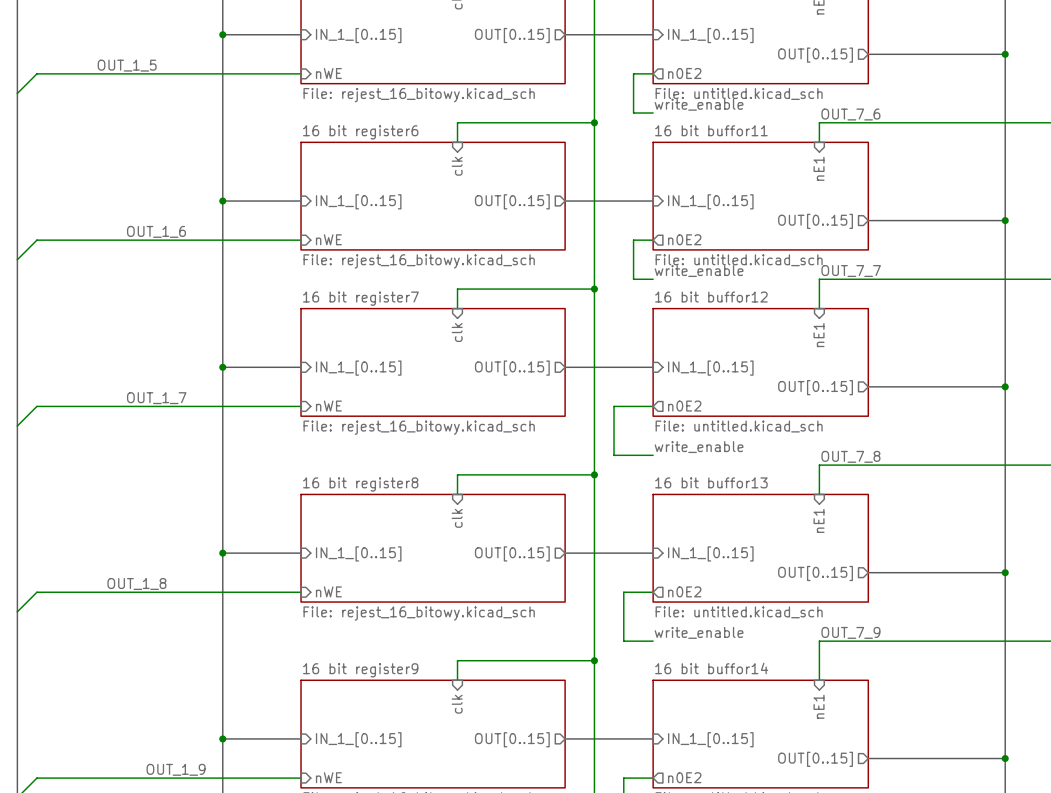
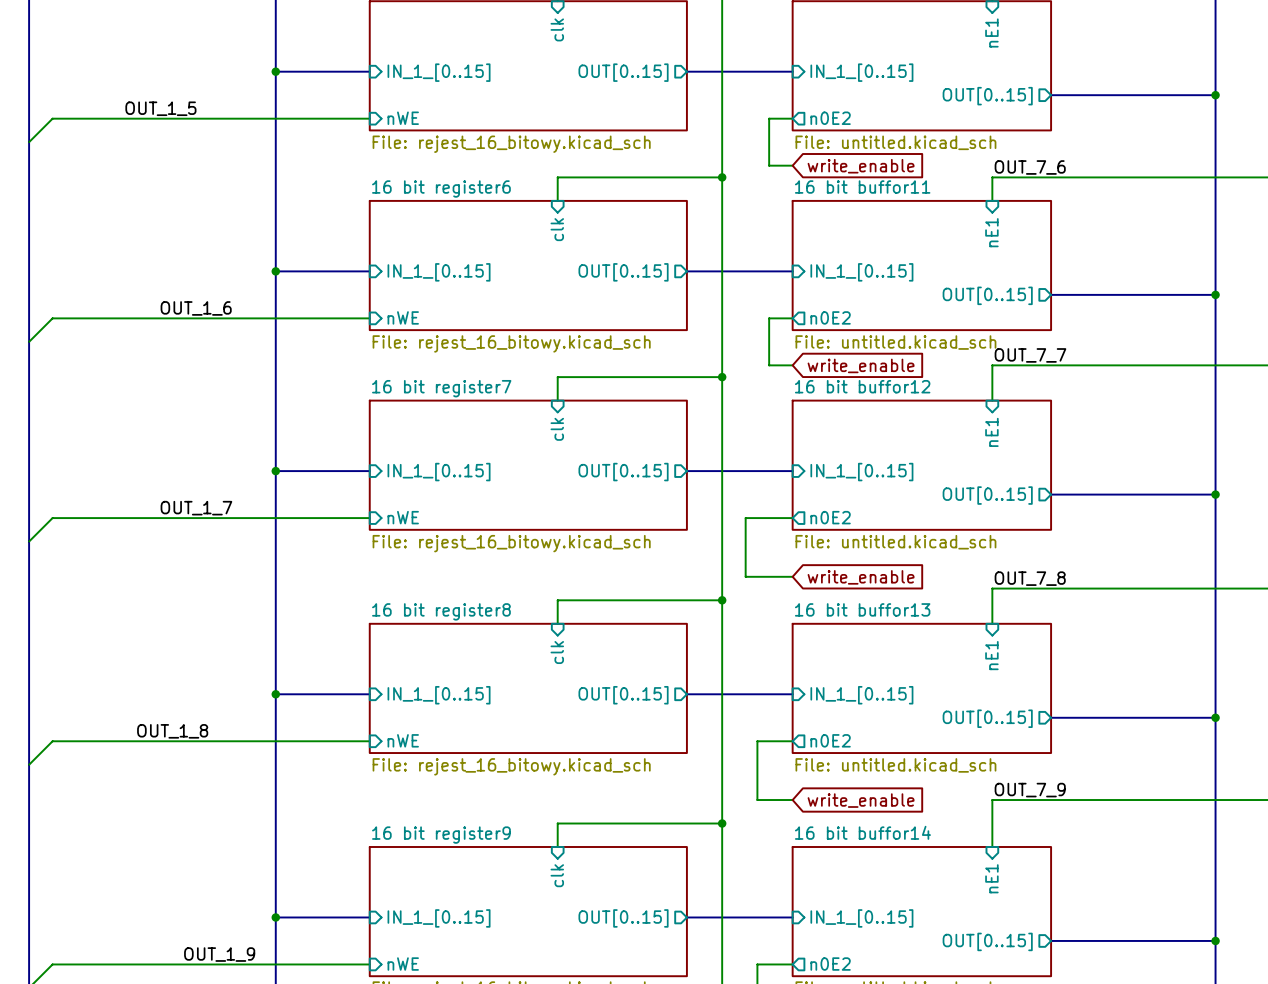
label: write_enable (699, 104) -> none
global label: none -> write_enable (861, 166)
label: write_enable (699, 271) -> none
global label: none -> write_enable (861, 365)
label: write_enable (699, 447) -> none
global label: none -> write_enable (861, 577)
label: write_enable (699, 632) -> none
global label: none -> write_enable (861, 800)

